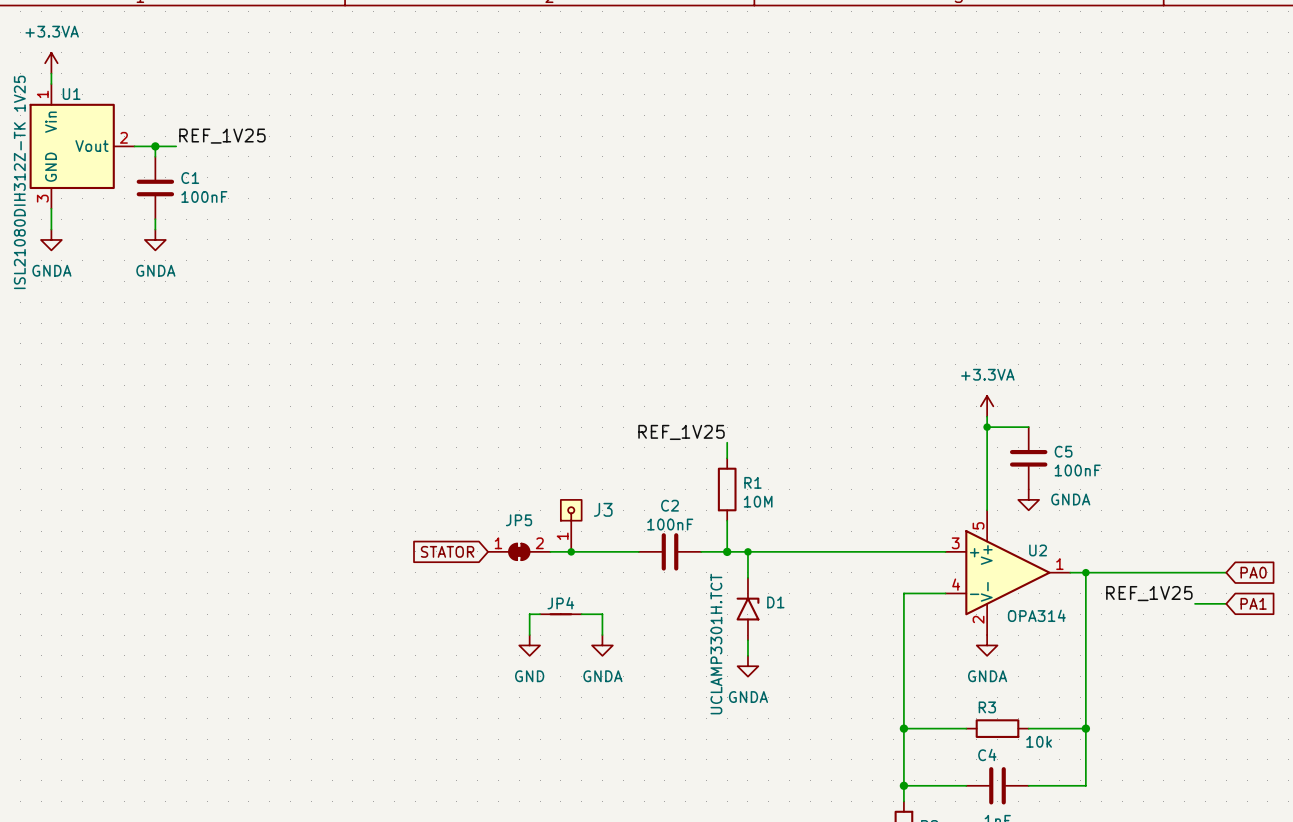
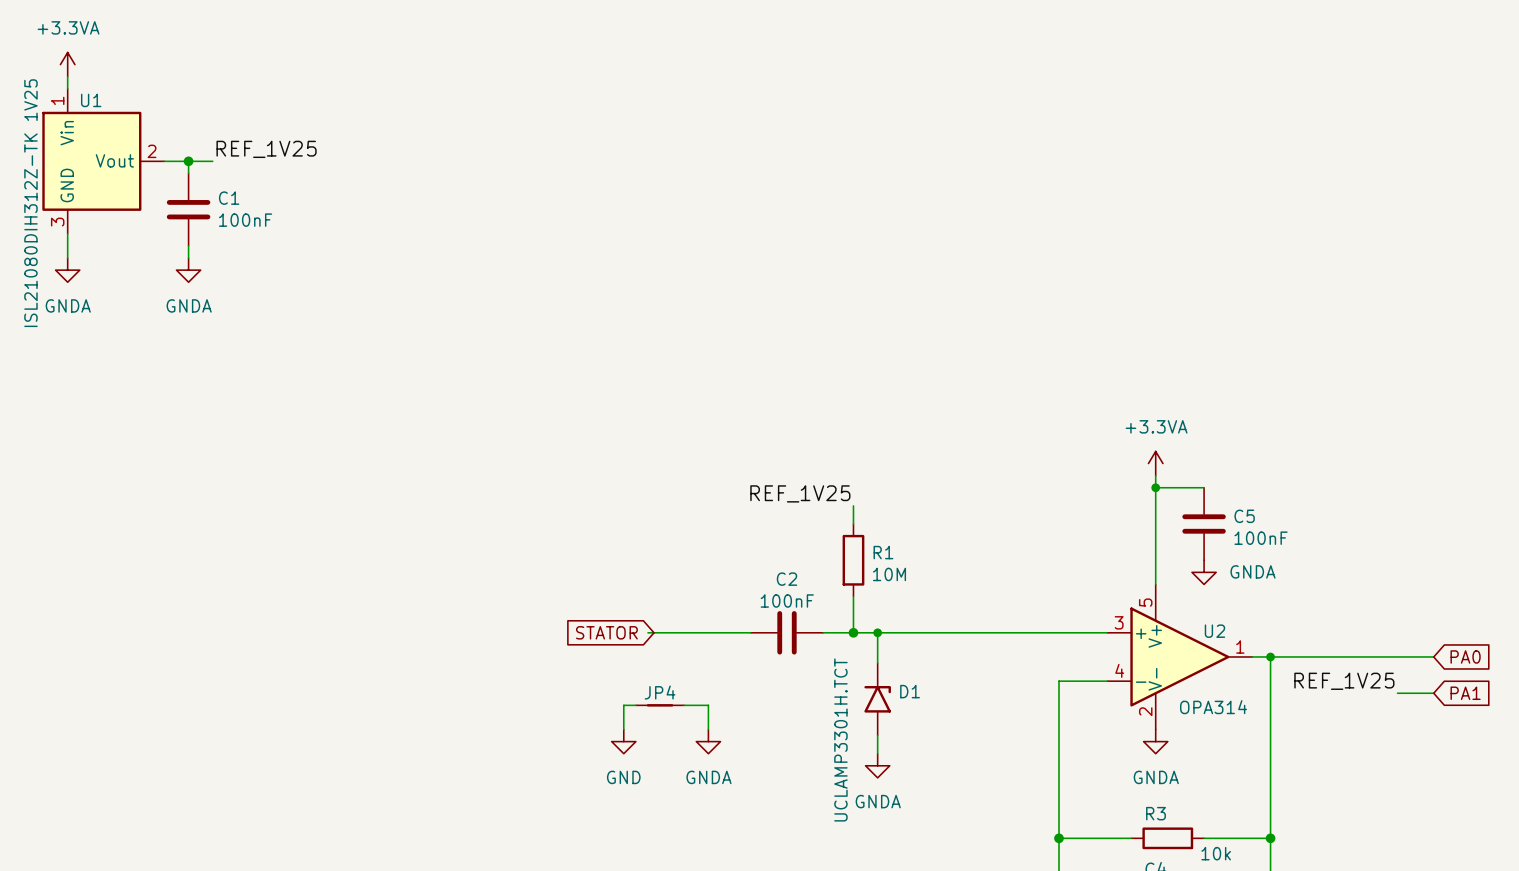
J3: (571, 525) -> none
global label position: STATOR (447, 551) -> STATOR (606, 632)
JP5: (519, 551) -> none
junction: (571, 551) -> none

